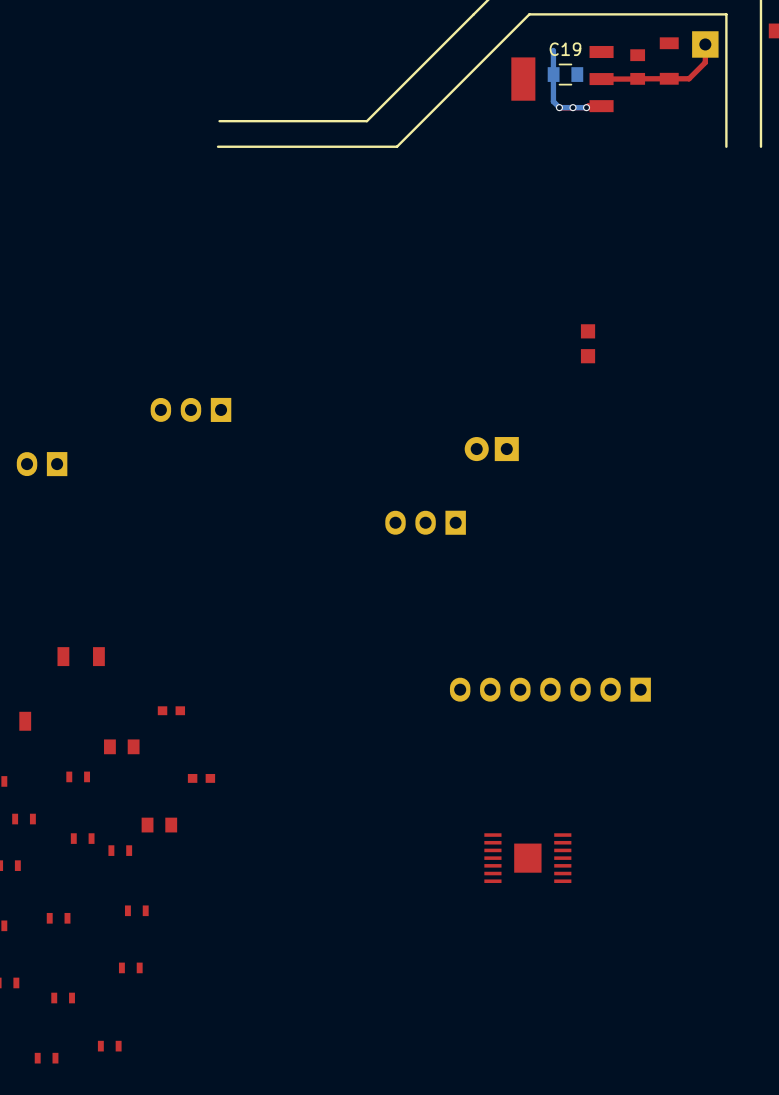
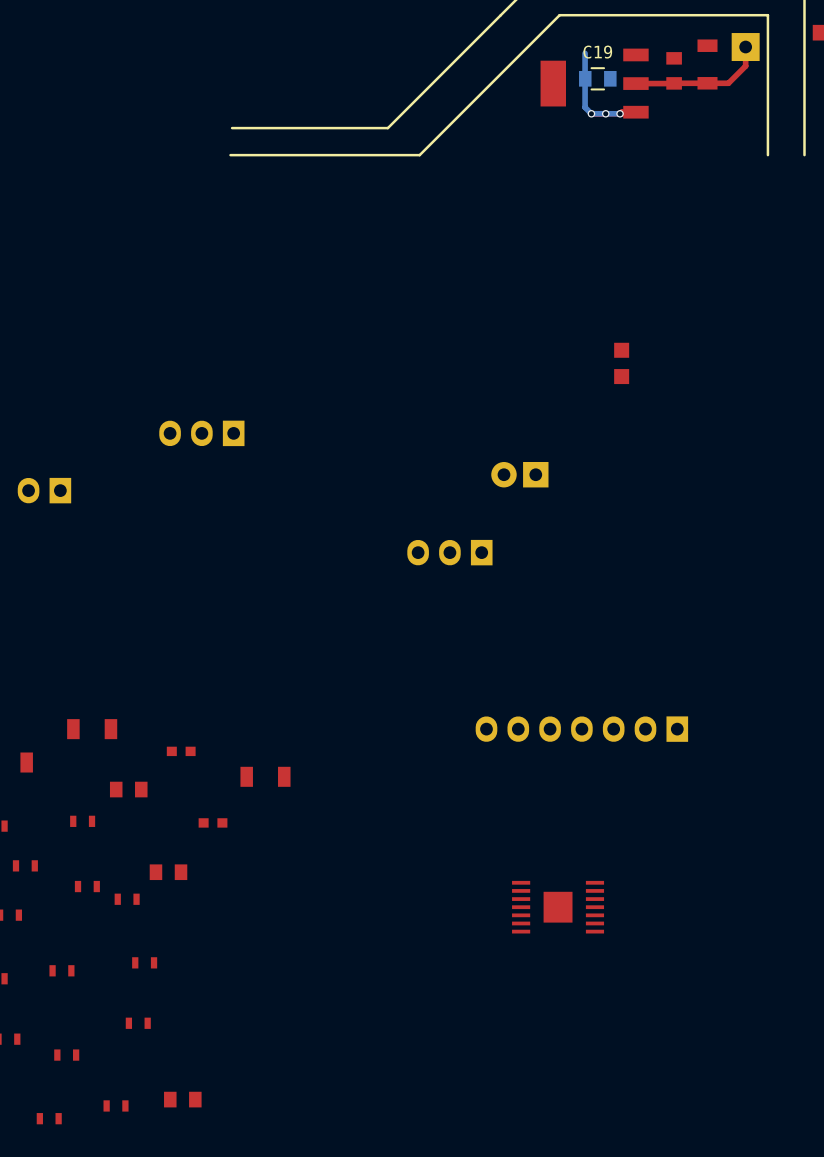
part position: (81, 656) -> (92, 729)
part: none -> (265, 776)
part: none -> (182, 1099)

